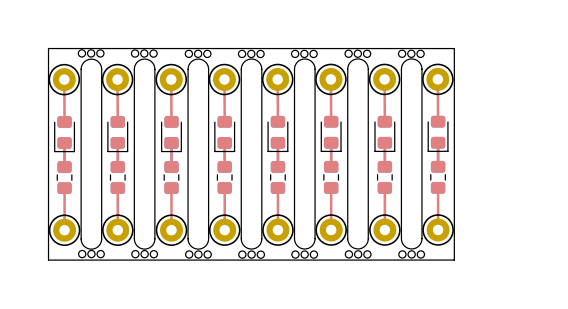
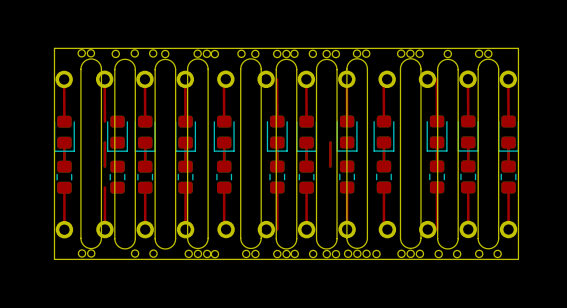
board edge: (54, 48) (48, 48) (48, 260) (454, 260) (454, 48) -> (54, 48) (54, 259) (518, 259) (518, 48) (453, 48)
part: (100, 53) -> none
part: (144, 53) -> none
part: (188, 53) -> none
part: (251, 53) -> none
part: (260, 53) -> none
part: (304, 53) -> none
part: (348, 53) -> none
part: none -> (479, 53)
part: none -> (488, 53)
part: none -> (115, 53)
part: none -> (165, 54)
part: none -> (214, 54)
part: none -> (255, 53)
part: none -> (277, 53)
part: none -> (286, 53)
part: none -> (326, 54)
part: none -> (335, 54)
part: none -> (447, 53)
part footprint: [48, 63, 81, 96] -> [55, 70, 73, 89]
part footprint: [208, 63, 241, 96] -> [217, 70, 235, 88]
part footprint: [368, 63, 401, 96] -> [378, 70, 396, 89]
part footprint: [422, 63, 454, 96] -> [418, 70, 437, 89]
board edge: (134, 69) (134, 238) (137, 246) (144, 249) (151, 246) (154, 238) (154, 69) (151, 62) (144, 59) (137, 62) (134, 69) -> (114, 69) (114, 238) (117, 245) (125, 248) (132, 245) (135, 238) (135, 69) (132, 62) (125, 59) (117, 62) (114, 69)
board edge: none -> (155, 69) (155, 238) (158, 245) (165, 248) (172, 245) (175, 238) (175, 69) (172, 62) (165, 59) (158, 62) (155, 69)
board edge: (294, 69) (294, 238) (297, 245) (304, 248) (312, 245) (315, 238) (315, 69) (312, 61) (304, 58) (297, 61) (294, 69) -> (276, 69) (276, 238) (279, 245) (286, 248) (293, 245) (296, 238) (296, 69) (293, 62) (286, 59) (279, 62) (276, 69)
board edge: none -> (316, 69) (316, 238) (319, 245) (326, 248) (334, 245) (337, 238) (337, 69) (334, 62) (326, 59) (319, 62) (316, 69)
board edge: none -> (437, 69) (437, 238) (440, 245) (447, 248) (455, 245) (458, 238) (458, 69) (455, 62) (447, 59) (440, 62) (437, 69)
board edge: none -> (478, 69) (478, 238) (481, 245) (488, 248) (495, 245) (498, 238) (498, 69) (495, 62) (488, 59) (481, 62) (478, 69)
part: none -> (104, 79)
top track: (117, 79) (117, 121) -> (104, 79) (104, 121)
part: (117, 79) -> none
top track: none -> (144, 79) (145, 121)
part: none -> (144, 79)
top track: (171, 79) (171, 121) -> (185, 79) (185, 121)
part: (171, 79) -> none
part: none -> (185, 79)
part: none -> (266, 79)
part: (277, 79) -> none
top track: none -> (306, 79) (306, 121)
part: none -> (306, 79)
top track: (330, 79) (331, 121) -> (346, 79) (347, 121)
part: (330, 79) -> none
part: none -> (346, 79)
top track: none -> (468, 79) (468, 121)
part: none -> (468, 79)
top track: none -> (508, 79) (508, 121)
part: none -> (508, 79)
part: (331, 133) -> none
part: none -> (347, 133)
part: none -> (468, 133)
part: none -> (508, 133)
part: none -> (145, 133)
part: (171, 134) -> none
part: none -> (185, 133)
part: none -> (306, 133)
top track: (117, 142) (117, 167) -> (104, 142) (104, 166)
top track: none -> (145, 142) (145, 166)
top track: (171, 142) (171, 167) -> (185, 142) (185, 166)
top track: none -> (306, 142) (306, 166)
top track: none -> (468, 142) (468, 166)
top track: none -> (508, 142) (508, 166)
part: none -> (145, 177)
part: (171, 177) -> none
part: none -> (185, 177)
part: none -> (306, 177)
part: (331, 177) -> none
part: none -> (347, 176)
part: none -> (468, 176)
part: none -> (508, 177)
top track: (331, 187) (331, 230) -> (347, 187) (347, 229)
top track: none -> (468, 187) (468, 229)
top track: none -> (508, 187) (508, 229)
top track: (117, 188) (117, 230) -> (104, 187) (104, 229)
top track: none -> (145, 187) (145, 229)
top track: (171, 188) (171, 230) -> (185, 187) (185, 229)
top track: none -> (306, 187) (306, 229)
part footprint: [48, 214, 81, 246] -> [55, 220, 74, 239]
part footprint: [208, 214, 241, 246] -> [217, 220, 235, 239]
part footprint: [369, 214, 401, 246] -> [378, 220, 397, 239]
part footprint: [422, 214, 454, 246] -> [419, 220, 437, 239]
part: none -> (468, 229)
part: none -> (104, 229)
part: (117, 230) -> none
part: none -> (145, 229)
part: (171, 230) -> none
part: none -> (185, 229)
part: none -> (266, 229)
part: (277, 230) -> none
part: none -> (306, 229)
part: (331, 230) -> none
part: none -> (347, 229)
part: none -> (508, 229)
part: (100, 254) -> none
part: (144, 254) -> none
part: none -> (214, 254)
part: (242, 254) -> none
part: none -> (246, 253)
part: (251, 254) -> none
part: none -> (255, 253)
part: (260, 254) -> none
part: none -> (277, 254)
part: none -> (286, 254)
part: (304, 254) -> none
part: none -> (326, 254)
part: none -> (335, 254)
part: none -> (376, 253)
part: none -> (438, 254)
part: none -> (457, 254)
part: none -> (479, 253)
part: none -> (497, 253)

